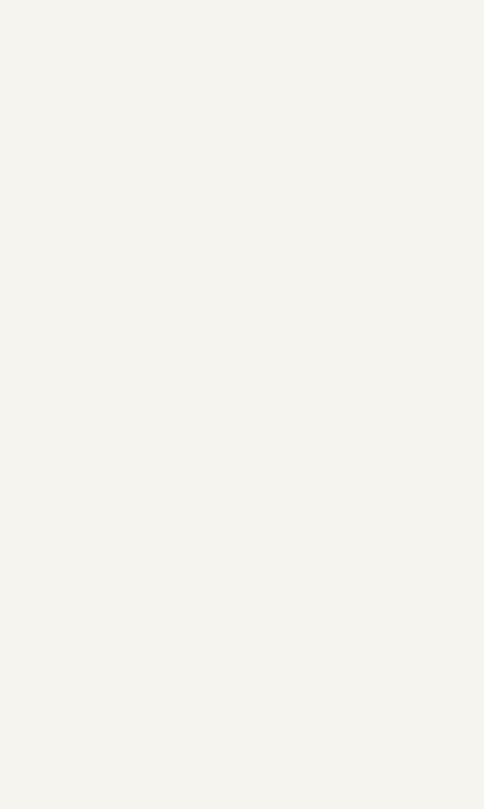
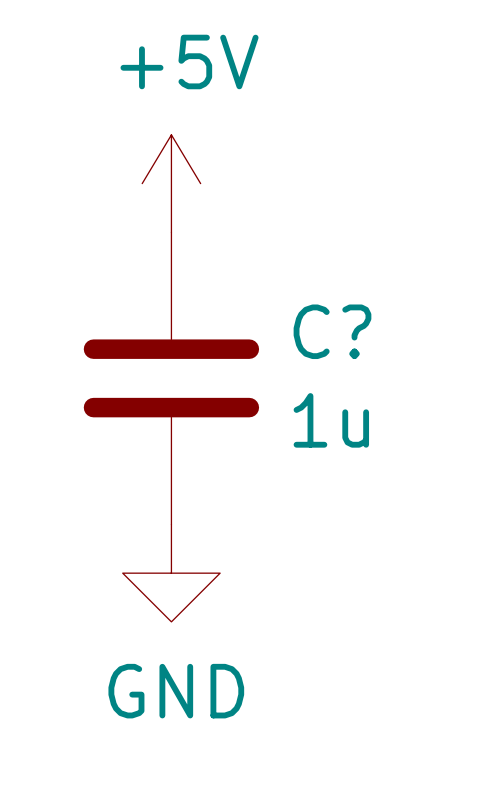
power symbol: none -> +5V (171, 183)
C?: none -> 1u (171, 378)
power symbol: none -> GND (171, 573)

